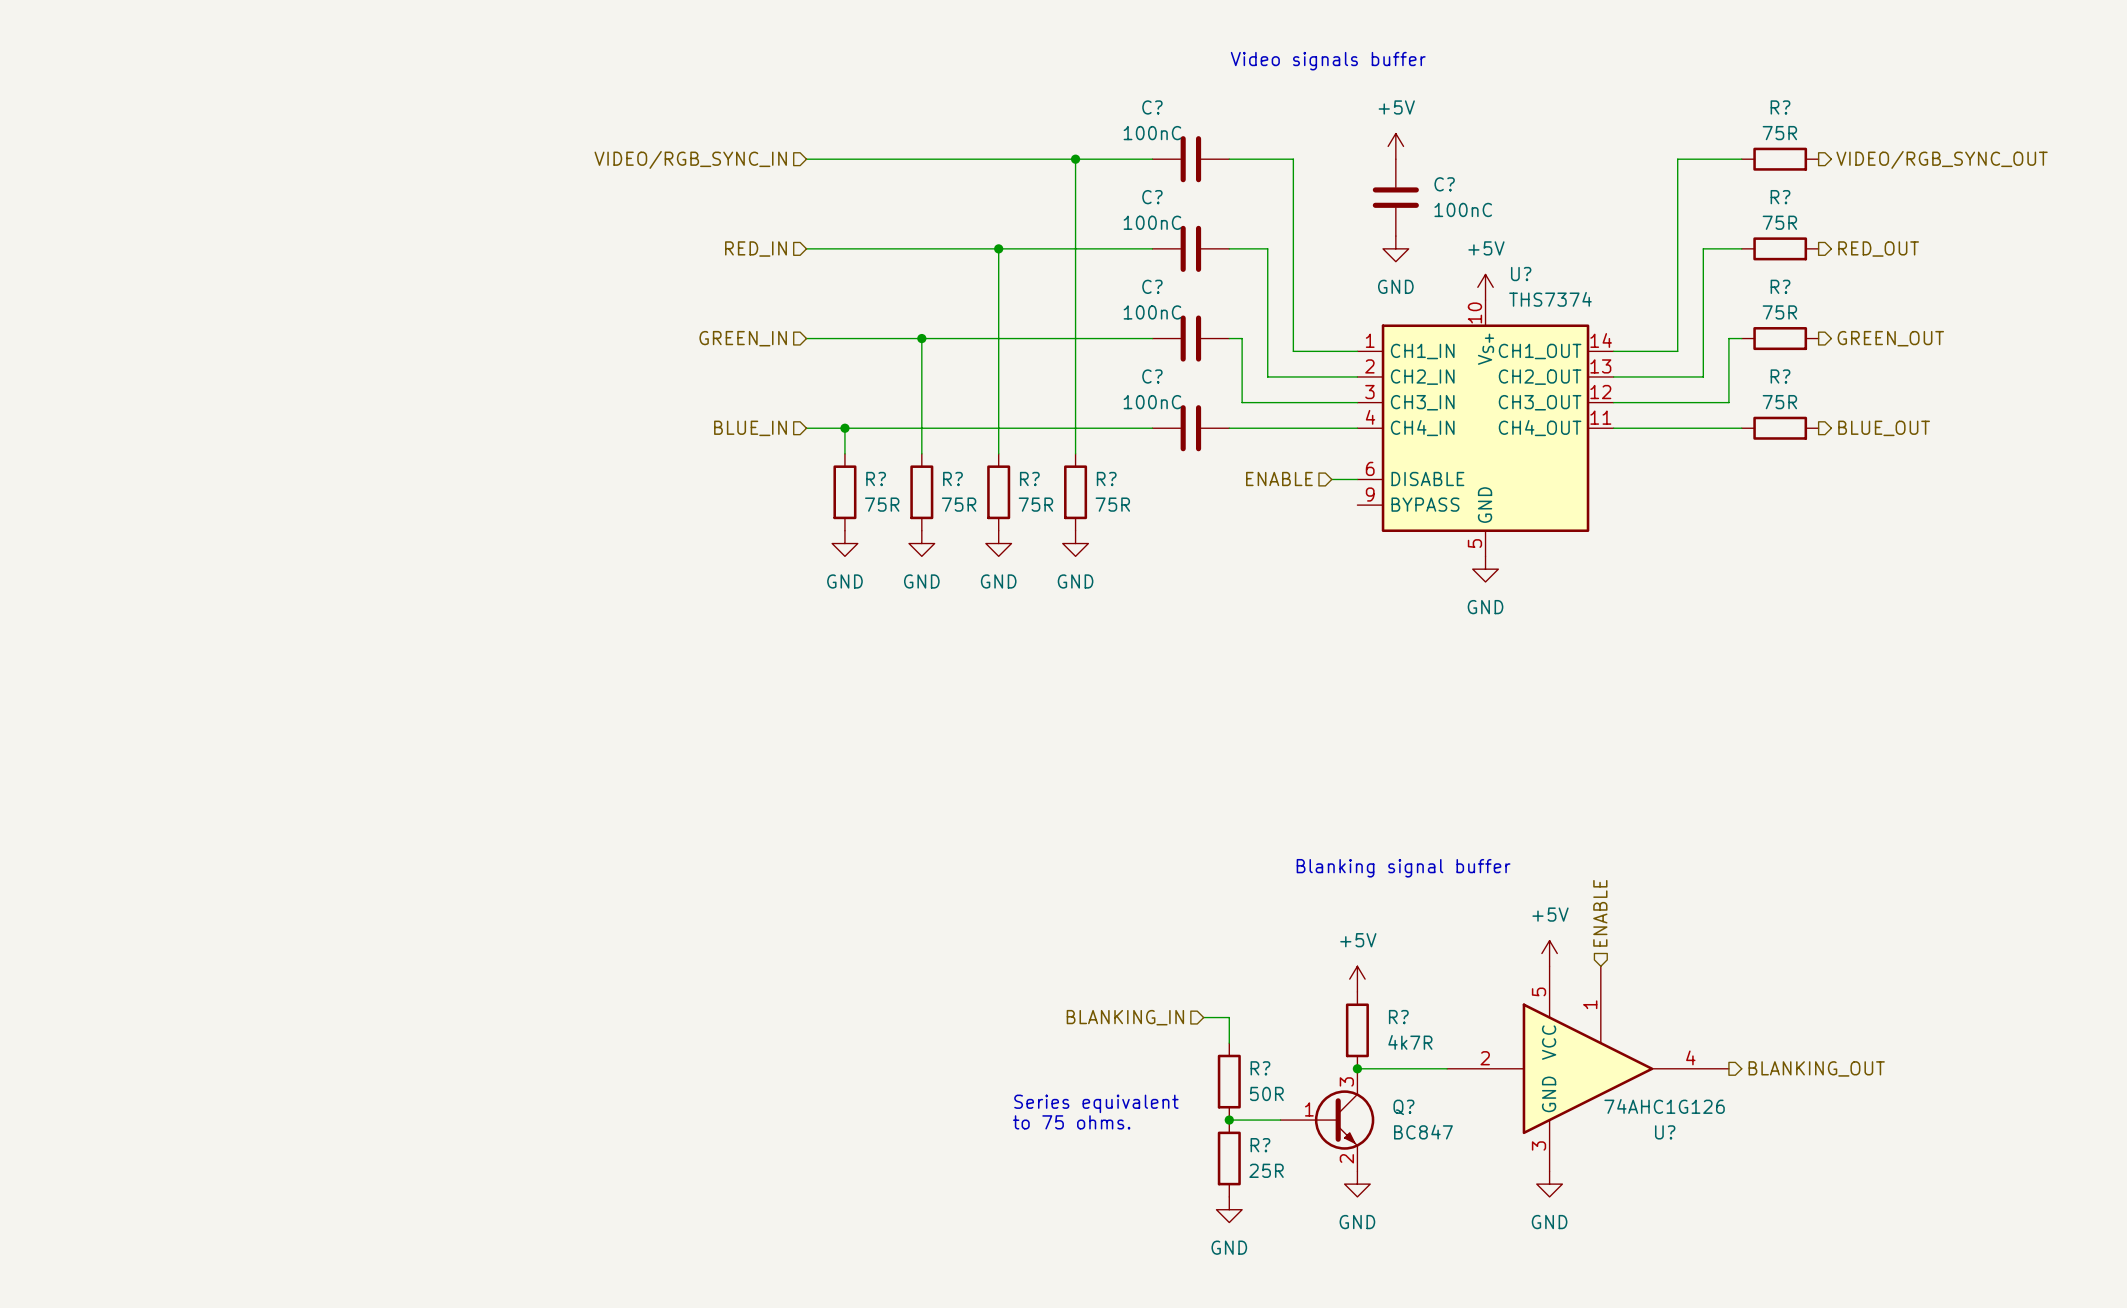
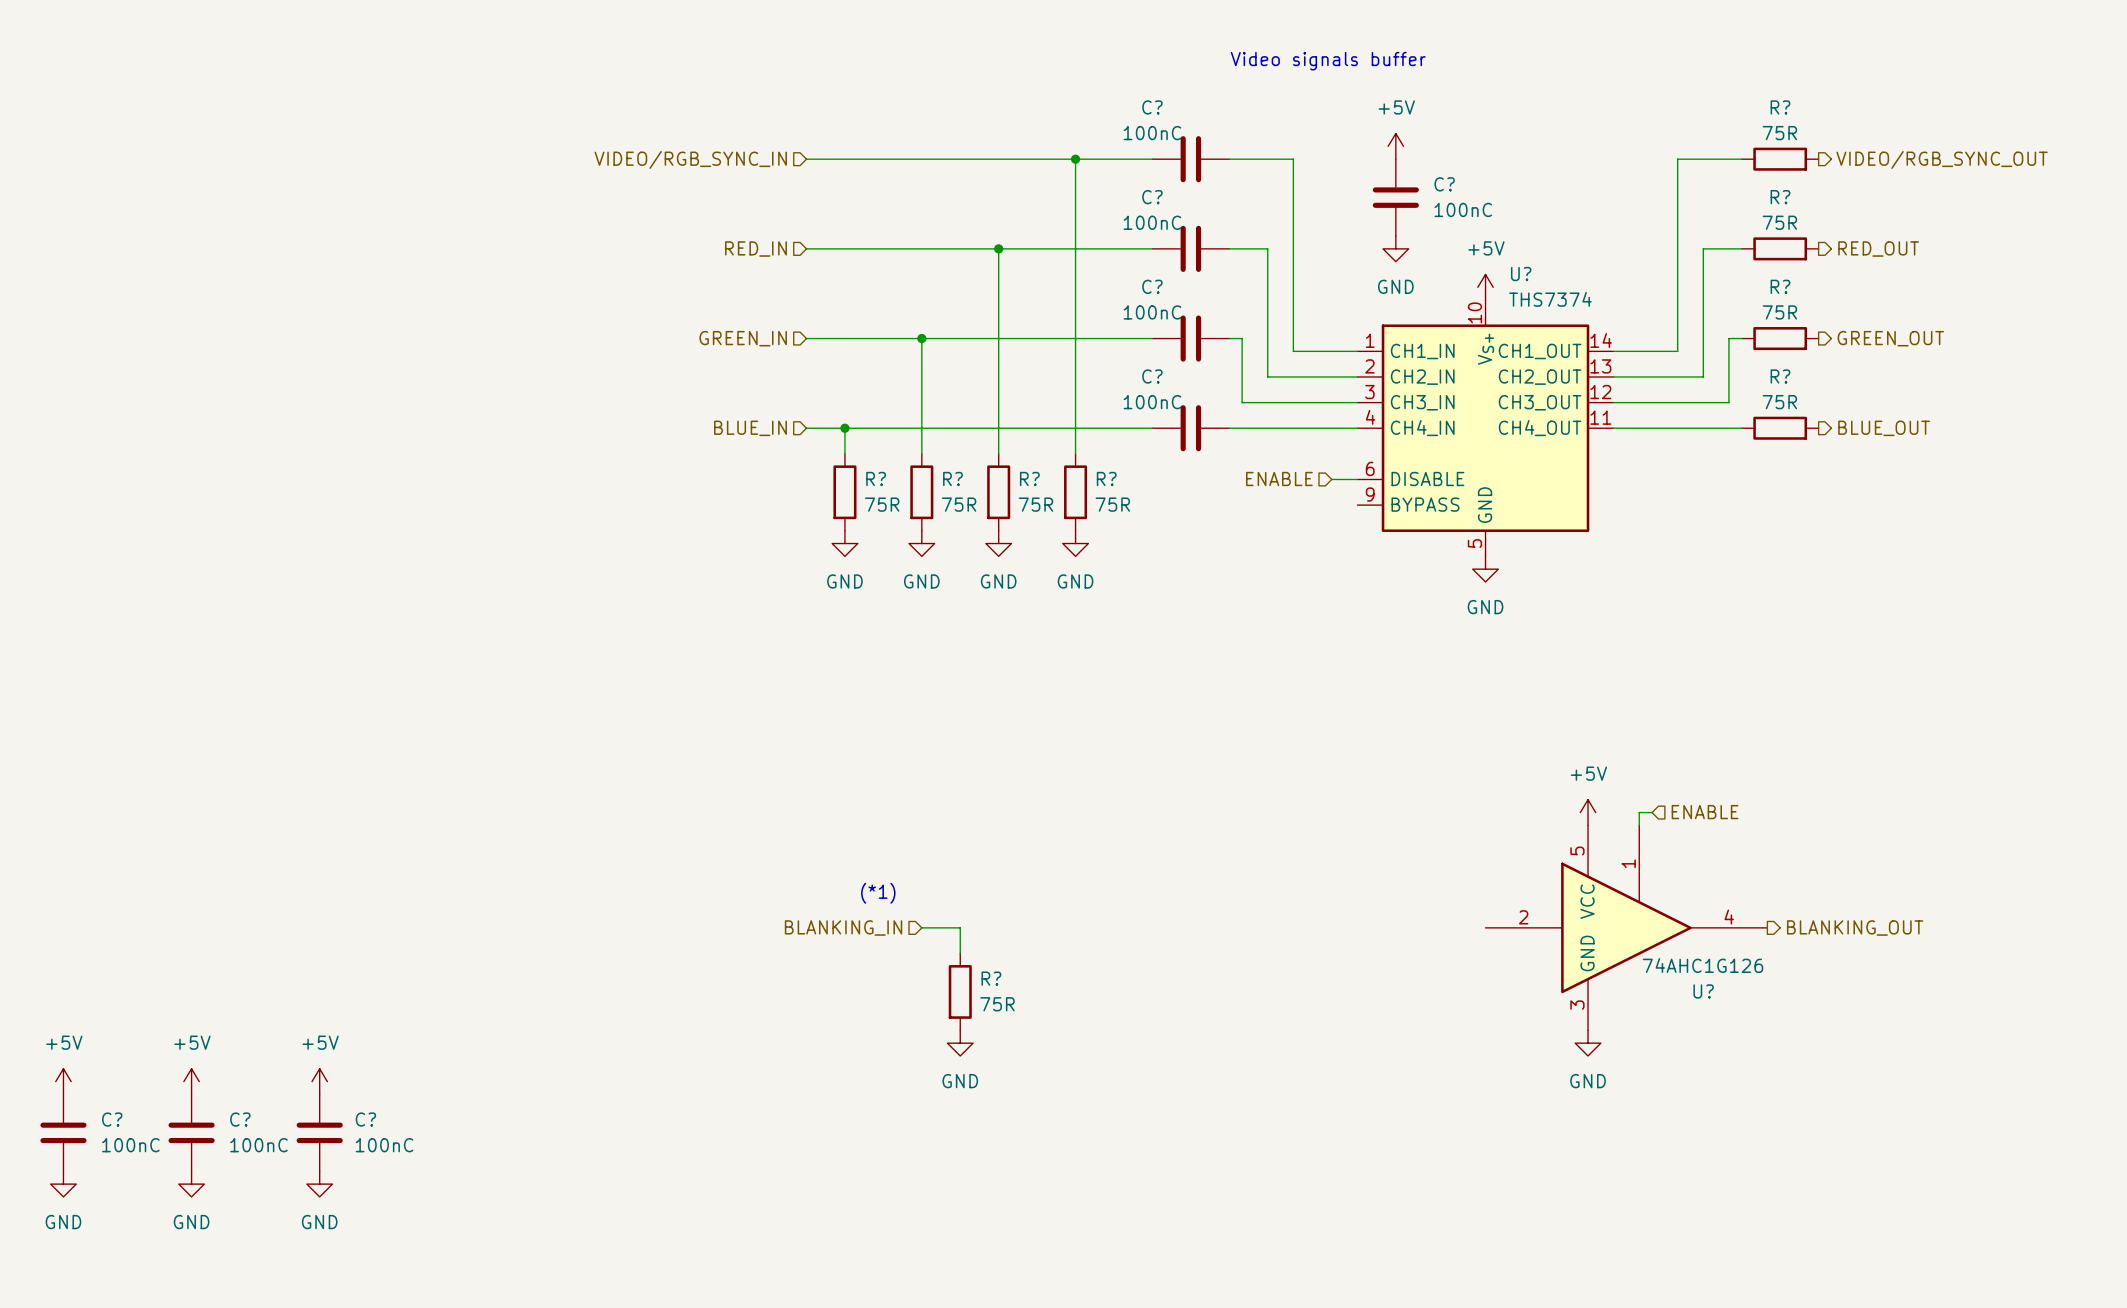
power symbol: none -> +5V (1588, 812)
wire: none -> (1652, 812) (1639, 812) (1639, 825)
text: Blanking signal buffer (1403, 868) -> none
text: none -> (*1) (878, 893)
hierarchical label rotation: 0° (1600, 913) -> 90° clockwise (1705, 812)
hierarchical label position: ENABLE (1600, 913) -> ENABLE (1705, 812)
wire: none -> (921, 927) (960, 927) (960, 953)
hierarchical label: none -> BLANKING_IN (843, 928)
power symbol: +5V (1549, 953) -> none
power symbol: +5V (1357, 979) -> none
R?: none -> 75R (960, 991)
hierarchical label: BLANKING_IN (1125, 1017) -> none
wire: (1203, 1017) (1229, 1017) (1229, 1043) -> none
R?: 4k7R (1357, 1030) -> none
power symbol: none -> GND (960, 1043)
power symbol: none -> GND (1588, 1043)
wire: (1357, 1068) (1447, 1068) -> none
junction: (1357, 1068) -> none
U? position: (1588, 1068) -> (1626, 927)
hierarchical label position: BLANKING_OUT (1816, 1068) -> BLANKING_OUT (1855, 928)
power symbol: none -> +5V (63, 1081)
power symbol: none -> +5V (191, 1081)
power symbol: none -> +5V (319, 1081)
R?: 50R (1229, 1081) -> none
text: Series equivalent (1096, 1103) -> none
wire: (1229, 1120) (1280, 1120) -> none
junction: (1229, 1120) -> none
Q?: BC847 (1327, 1120) -> none
text: to 75 ohms. (1071, 1122) -> none
C?: none -> 100nC (63, 1132)
C?: none -> 100nC (191, 1132)
C?: none -> 100nC (319, 1132)
R?: 25R (1229, 1158) -> none
power symbol: none -> GND (63, 1184)
power symbol: none -> GND (191, 1184)
power symbol: none -> GND (319, 1184)
power symbol: GND (1357, 1184) -> none
power symbol: GND (1549, 1184) -> none
power symbol: GND (1229, 1209) -> none

